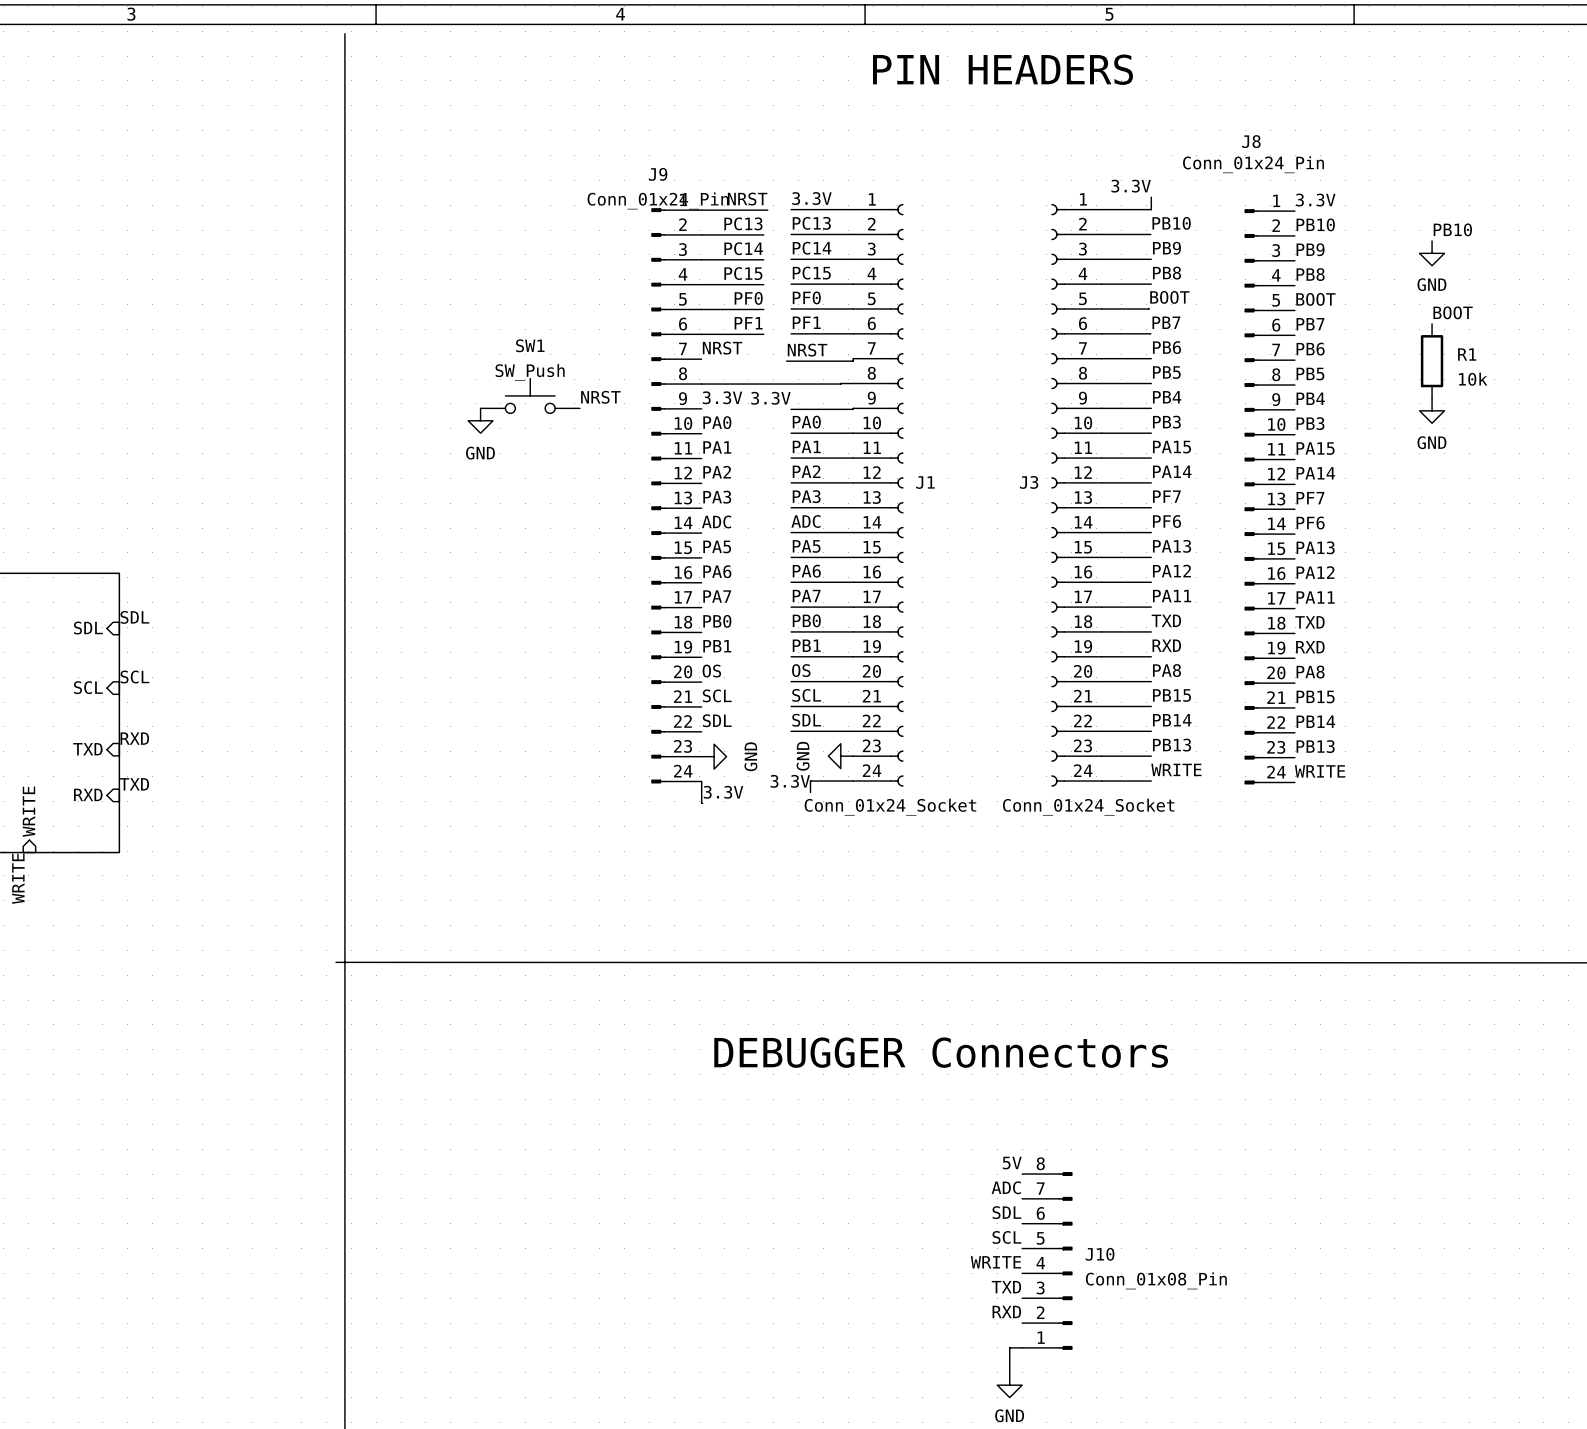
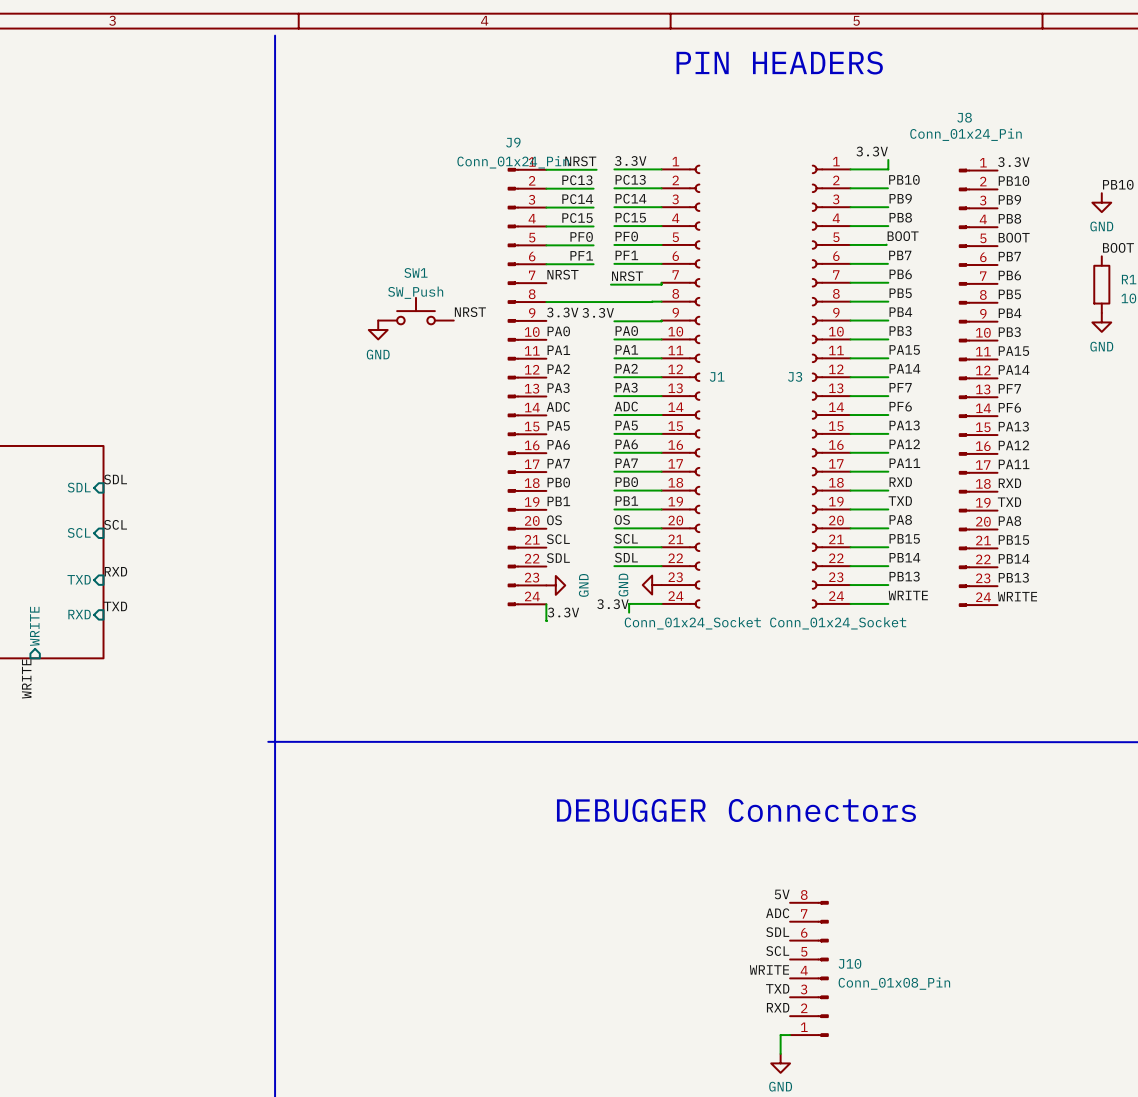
label: TXD (1166, 620) -> RXD (900, 482)
label: TXD (1309, 622) -> RXD (1009, 483)
label: RXD (1166, 645) -> TXD (900, 501)
label: RXD (1310, 647) -> TXD (1009, 502)

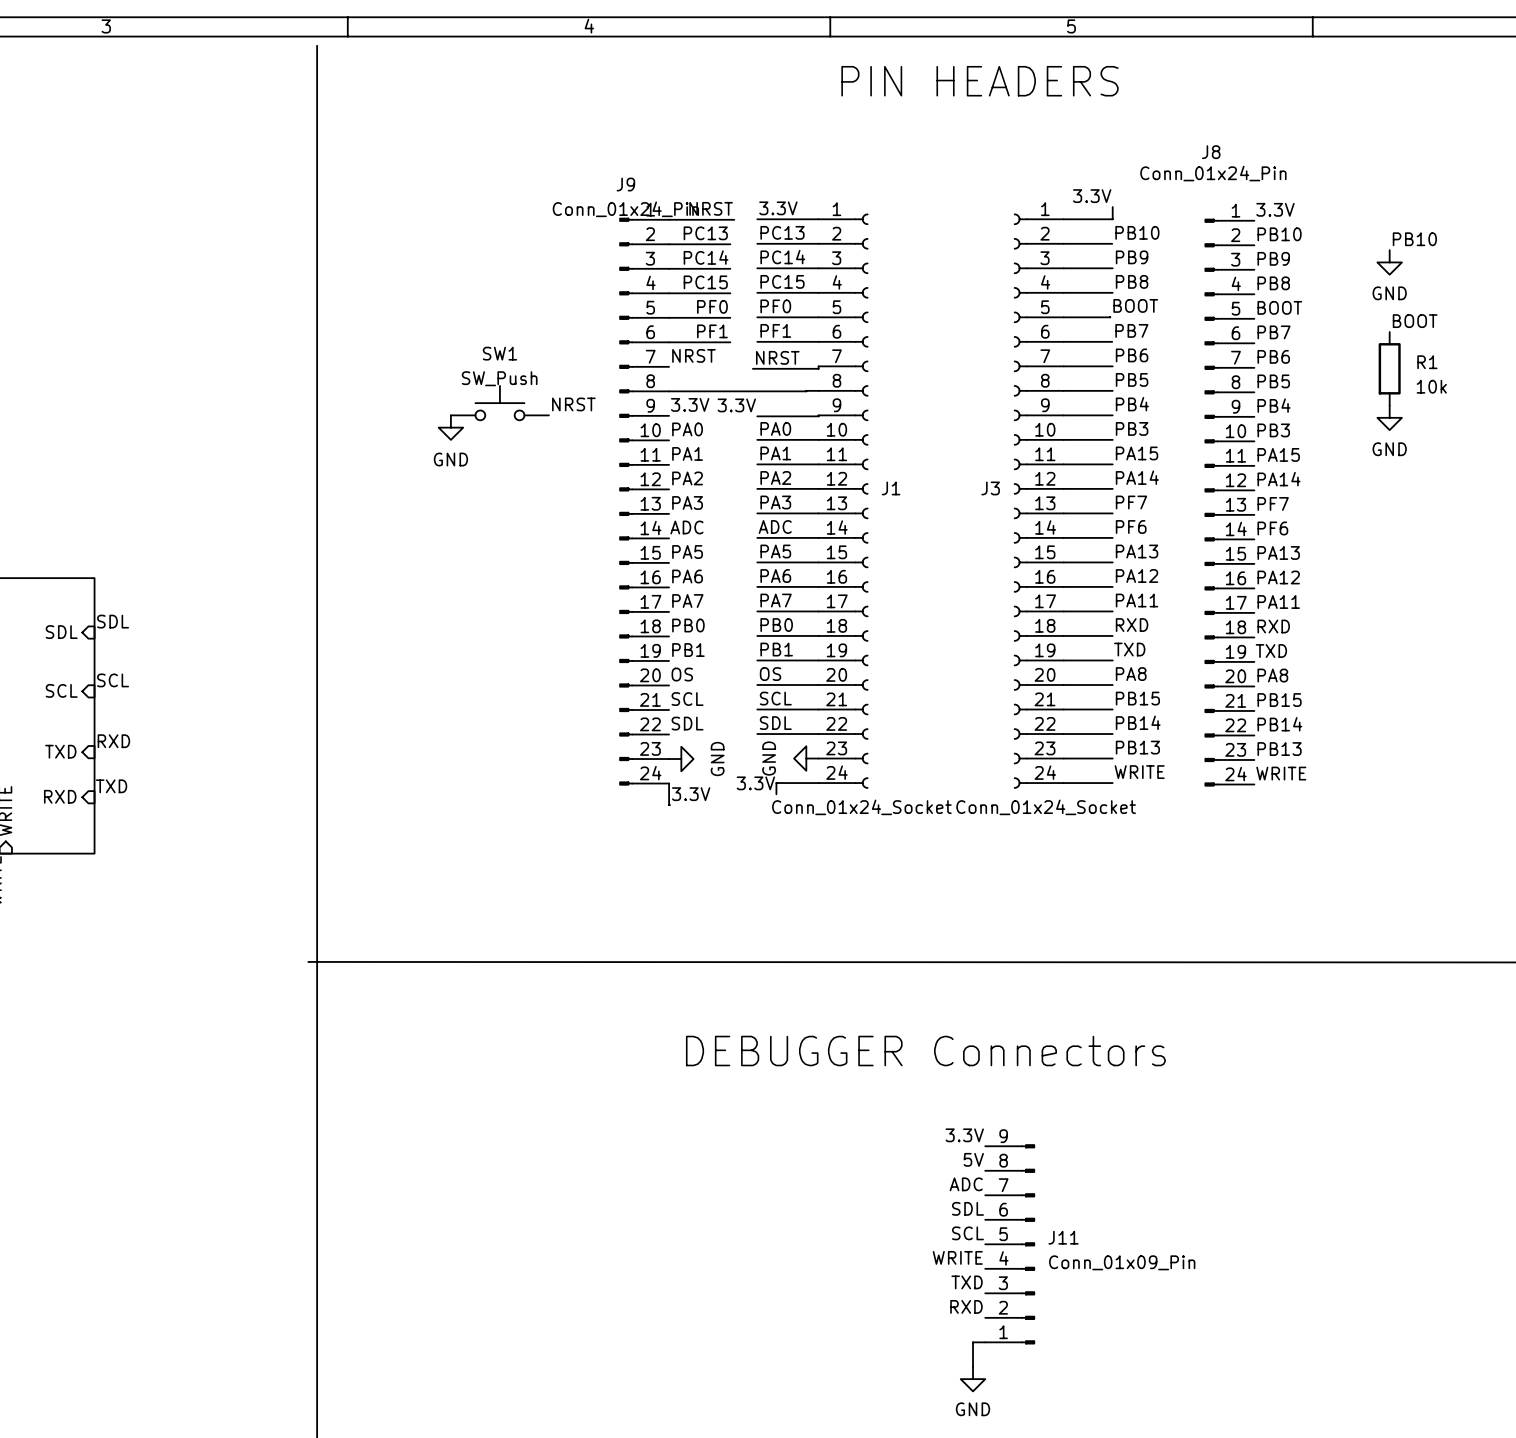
label: none -> 3.3V (964, 1135)
J11: none -> Conn_01x09_Pin (1010, 1244)
J10: Conn_01x08_Pin (809, 968) -> none

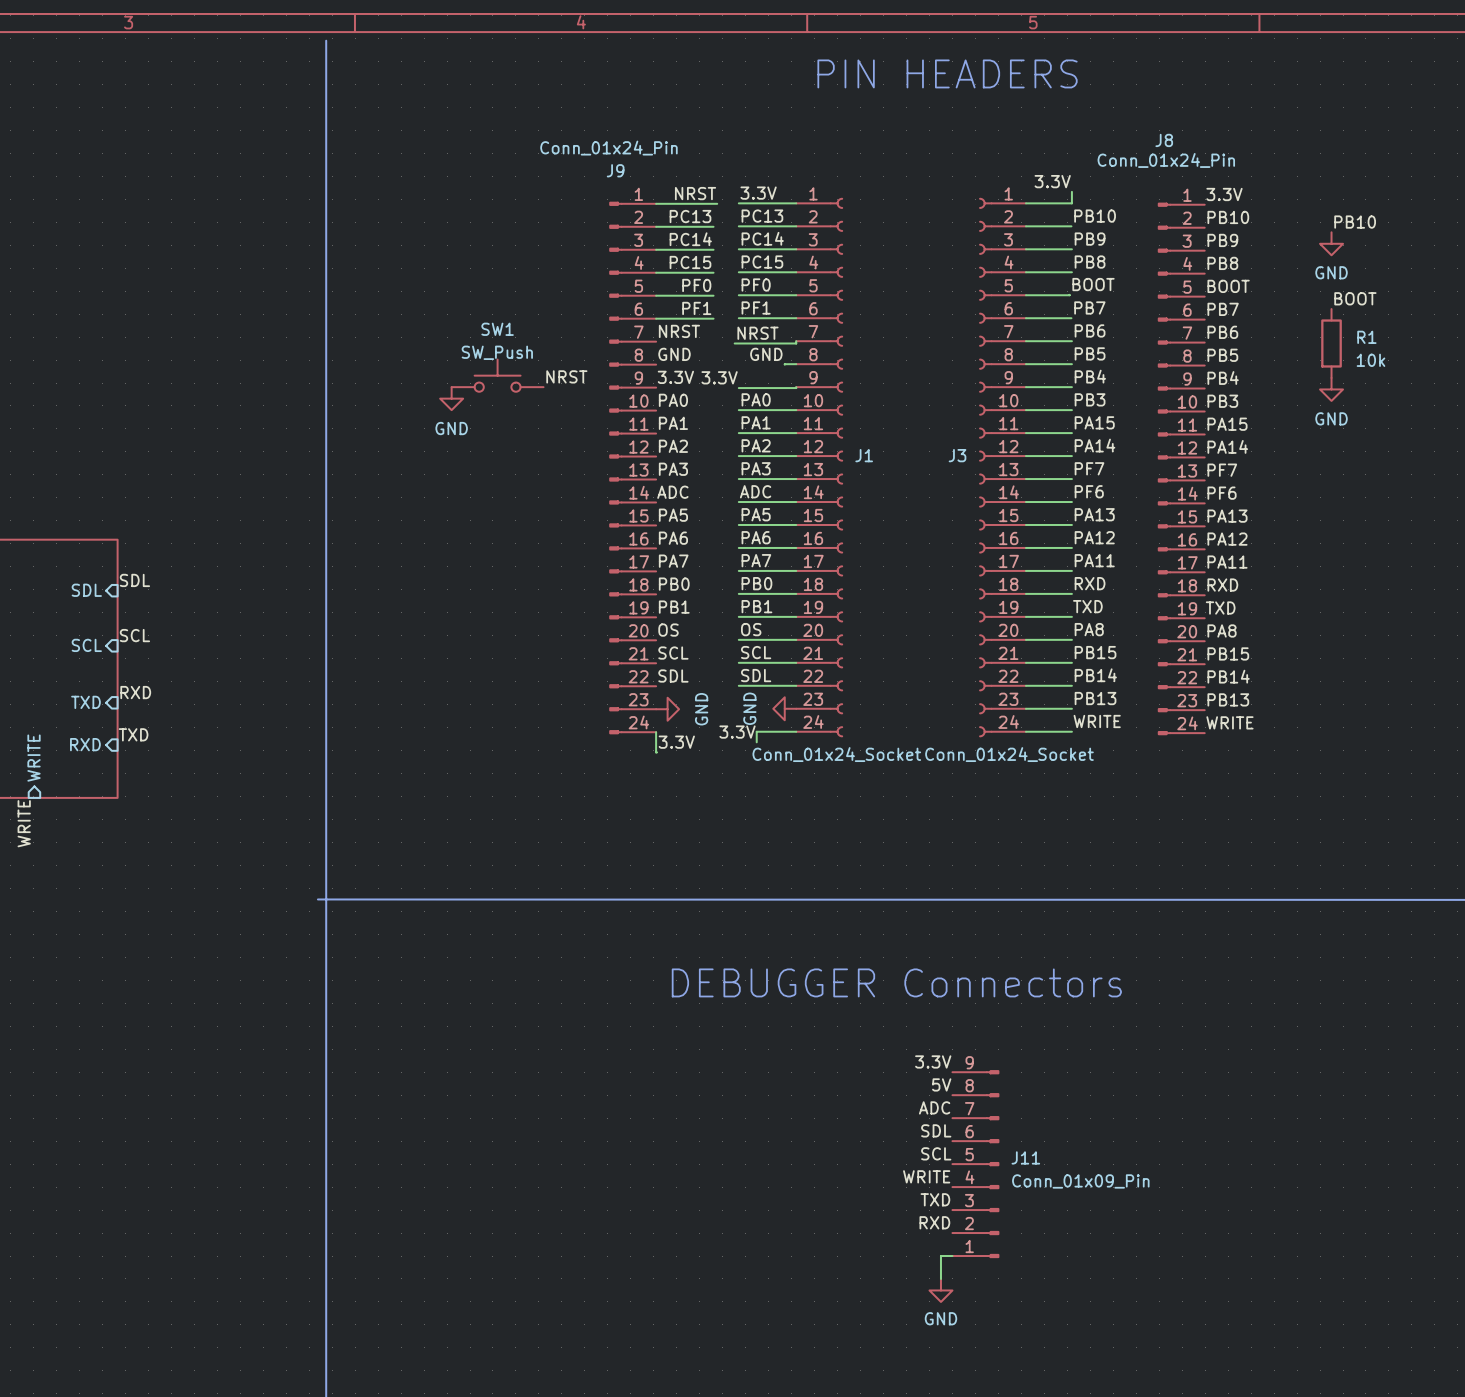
J9 value position: Conn_01x24_Pin (625, 209) -> Conn_01x24_Pin (608, 148)
label: none -> GND (674, 354)
label: none -> GND (766, 354)
wire: (669, 391) (806, 391) -> none

